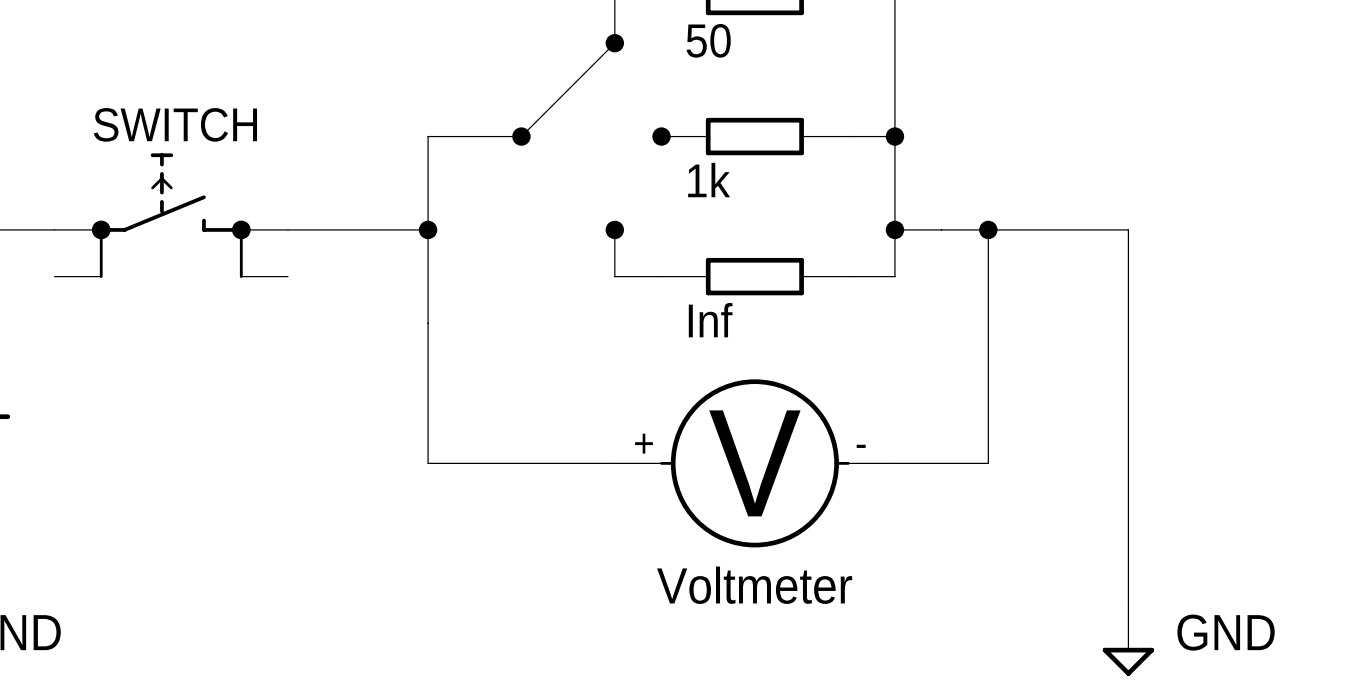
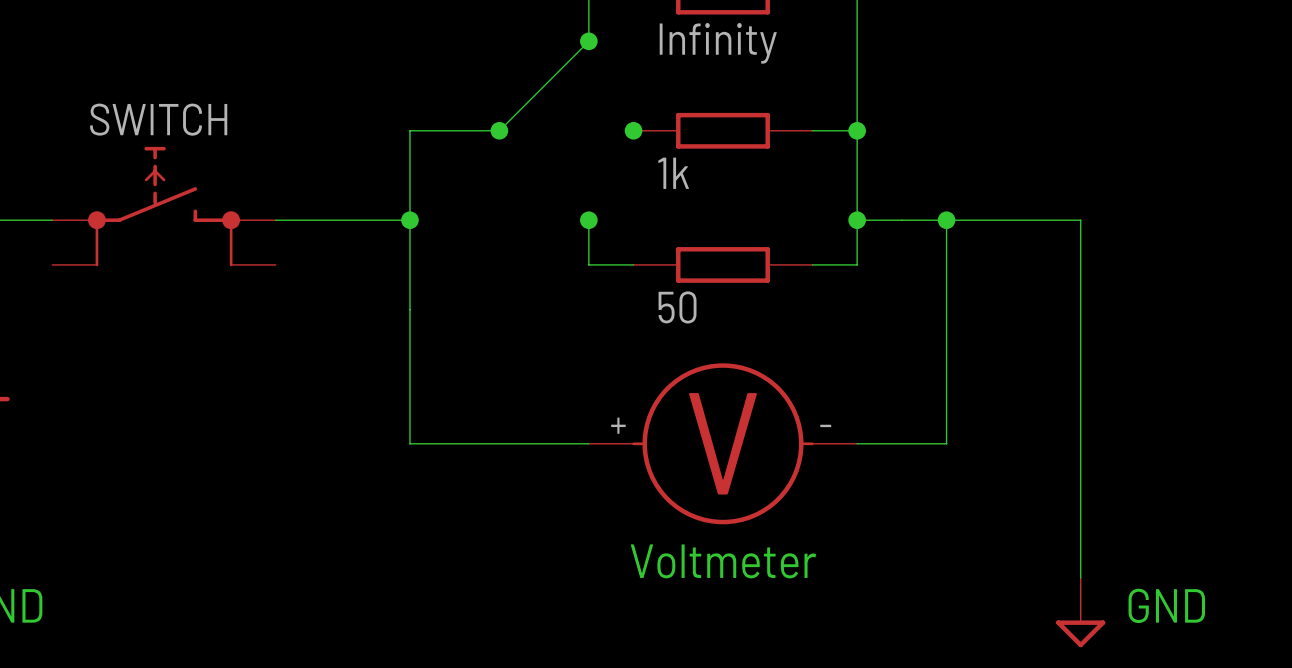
part value: 50 (708, 40) -> Infinity (718, 43)
part value: Inf (710, 320) -> 50 (677, 307)

